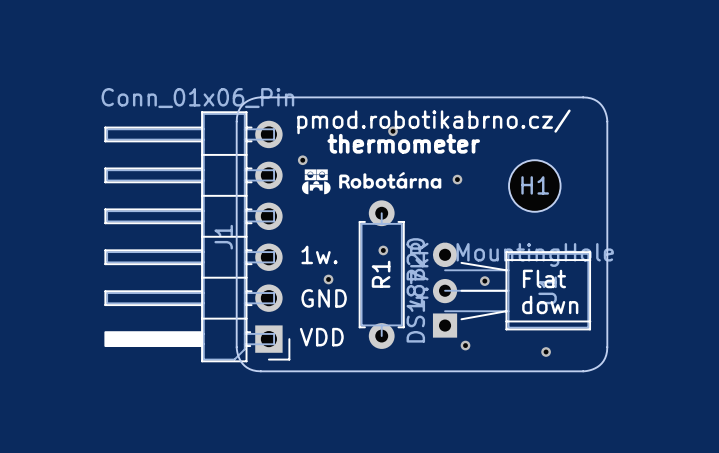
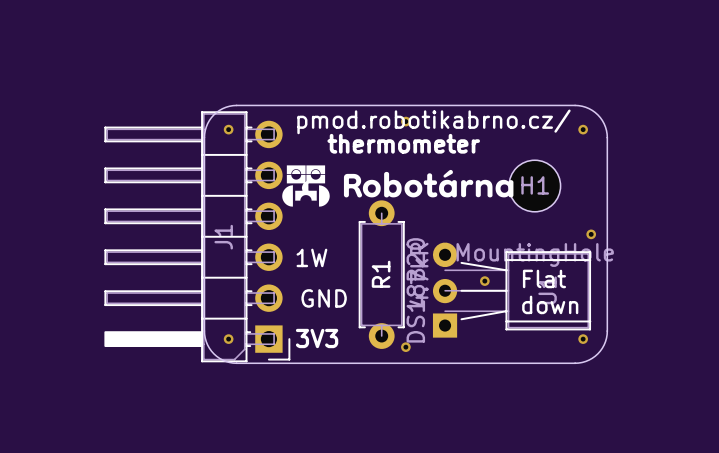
board edge: (260, 97) (251, 99) (242, 105) (237, 113) (236, 121) (236, 347) (239, 359) (246, 367) (260, 371) (583, 371) (595, 368) (603, 361) (607, 347) (607, 121) (604, 109) (597, 101) (583, 97) (260, 97) -> (204, 137) (204, 134) (205, 130) (206, 127) (211, 117) (219, 110) (233, 105) (575, 105) (589, 108) (600, 117) (607, 134) (607, 331) (604, 345) (592, 358) (575, 363) (236, 363) (222, 360) (209, 348) (204, 334) (204, 331) (204, 137)
J1 value: Conn_01x06_Pin (197, 98) -> none
via: none -> (228, 129)
via: none -> (583, 129)
via position: (392, 131) -> (405, 121)
via: (302, 160) -> none
drawing: none -> [282, 165, 330, 207]
drawing: [304, 169, 442, 195] -> none
drawing: none -> [423, 169, 514, 198]
drawing shape: [387, 174, 396, 189] -> [384, 171, 402, 198]
drawing shape: [350, 178, 362, 189] -> [343, 173, 363, 198]
drawing shape: [409, 178, 418, 189] -> [404, 179, 423, 198]
drawing: none -> [362, 179, 381, 198]
via: (457, 179) -> none
via: none -> (591, 234)
via: (383, 250) -> none
text: 1w. (319, 254) -> 1W (311, 257)
via: (328, 279) -> none
text: VDD (321, 337) -> 3V3 (317, 338)
via: none -> (228, 339)
via: (465, 345) -> none
via: none -> (405, 347)
via position: (546, 351) -> (583, 339)

